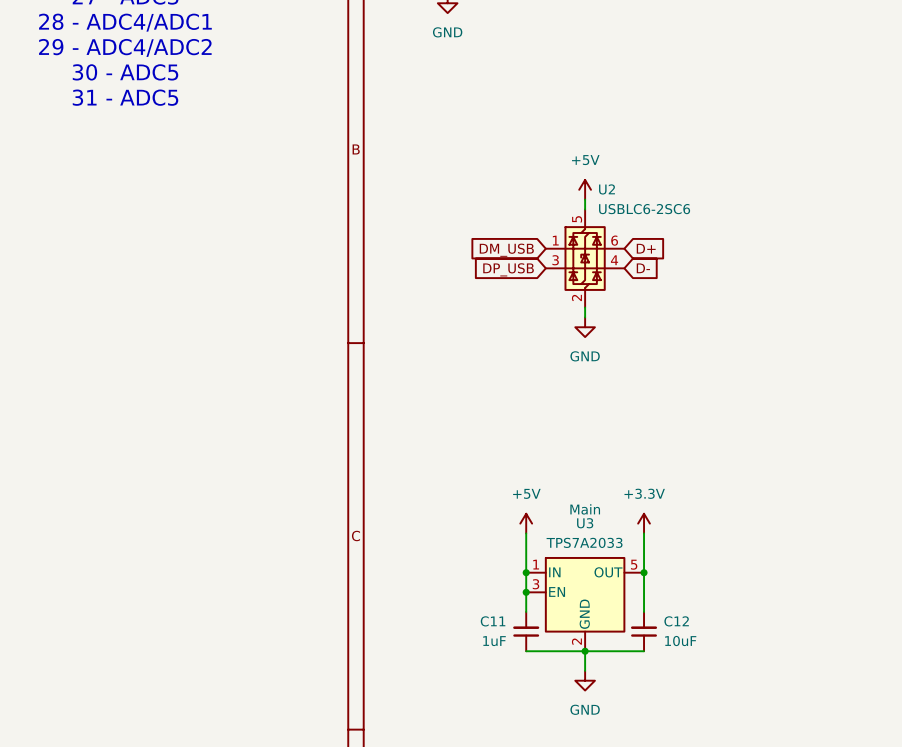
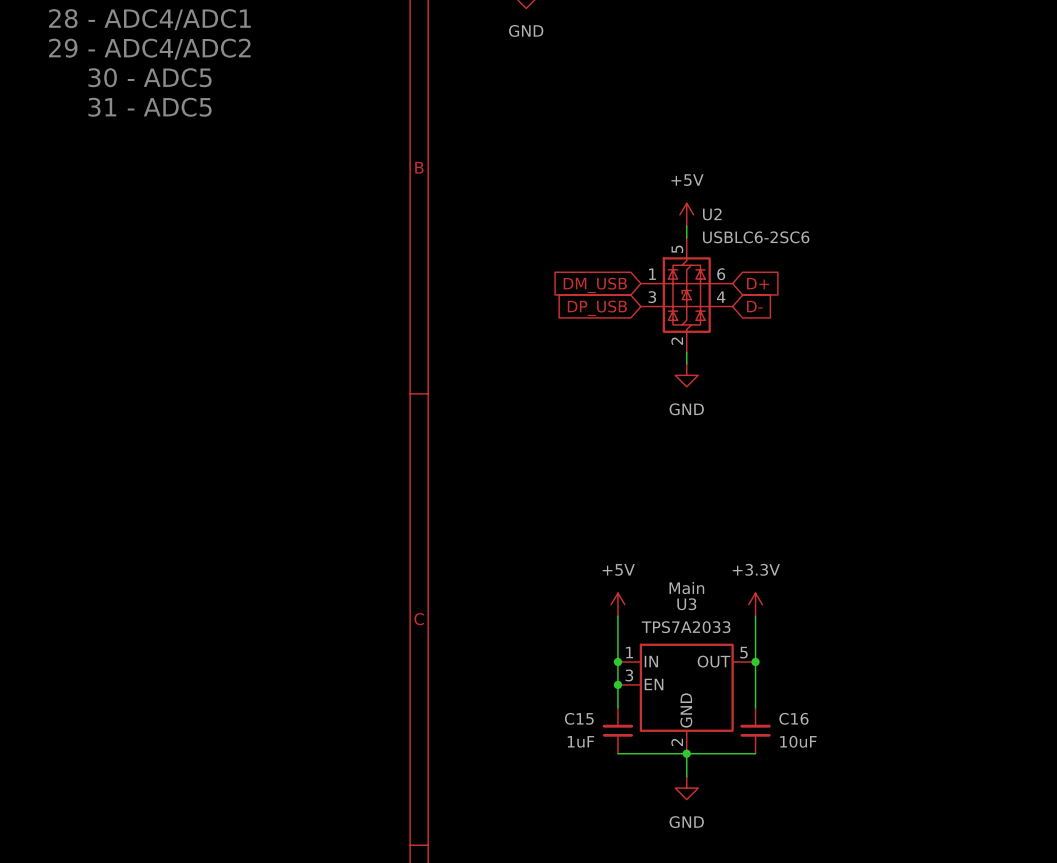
C11 name: C11 (493, 621) -> C15 (579, 718)
C12 name: C12 (676, 621) -> C16 (793, 718)

